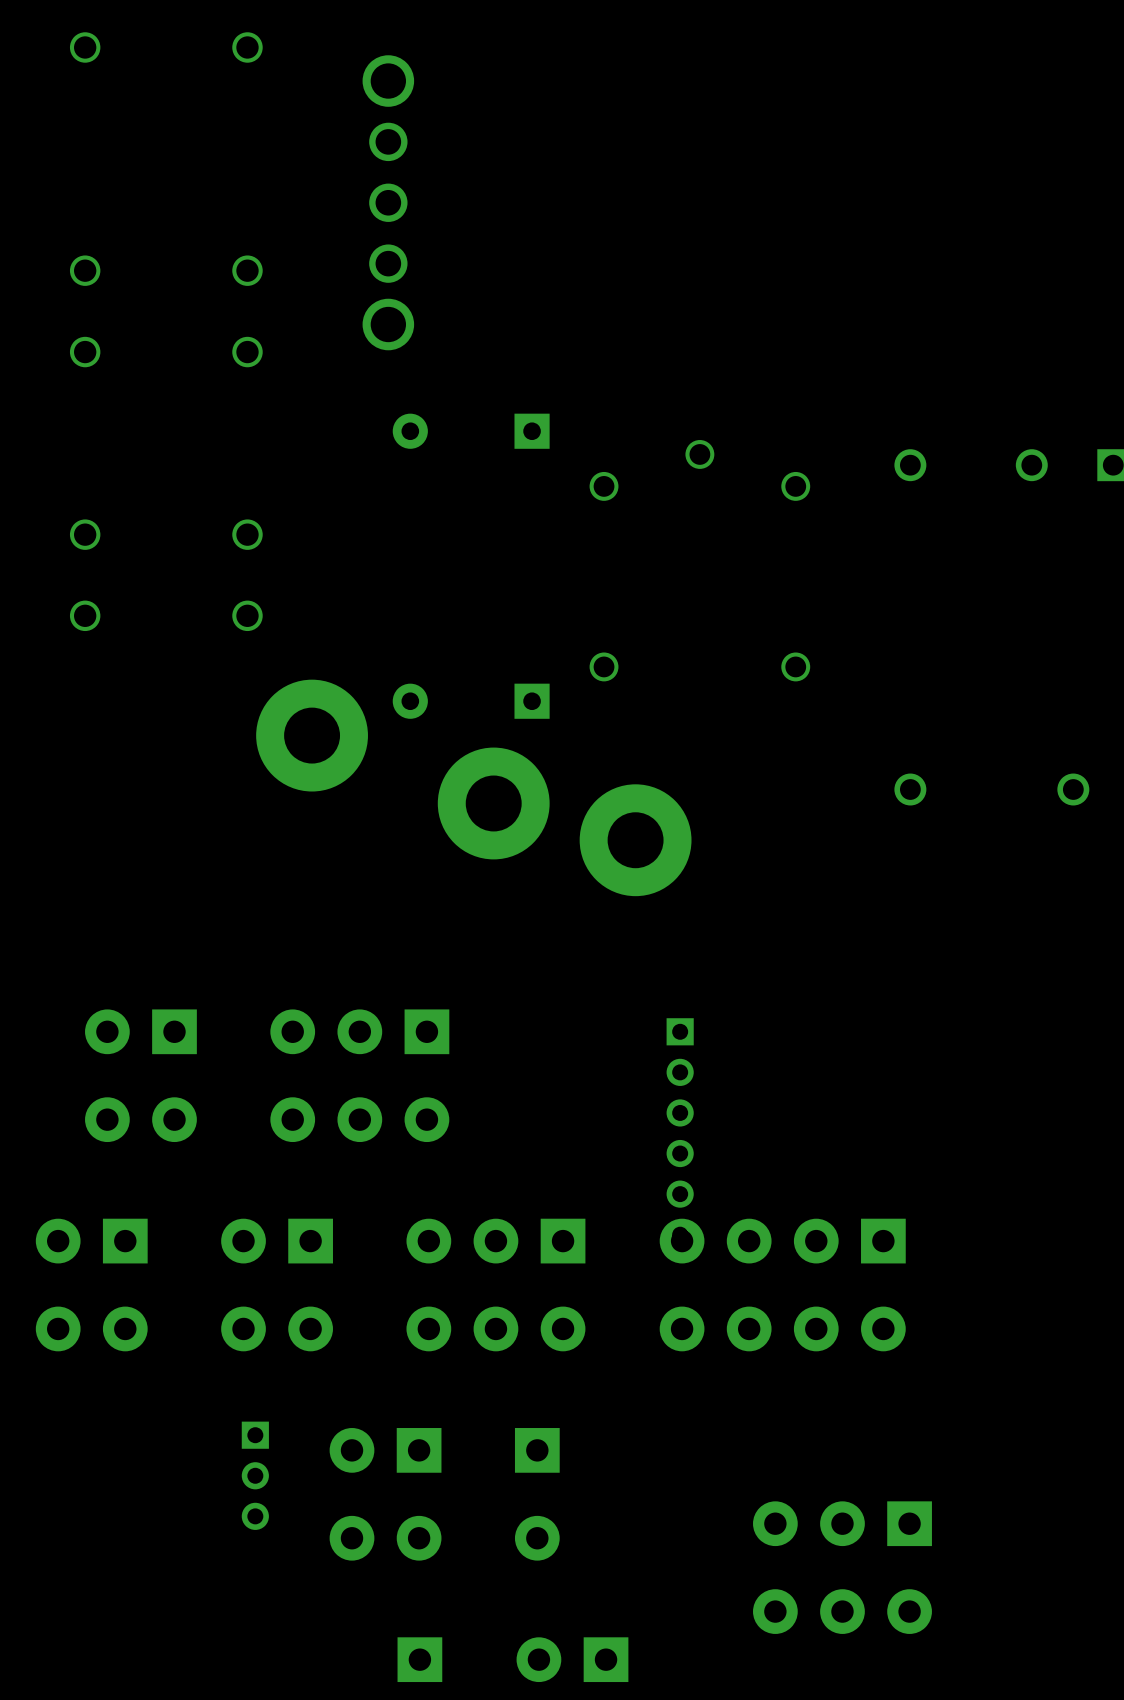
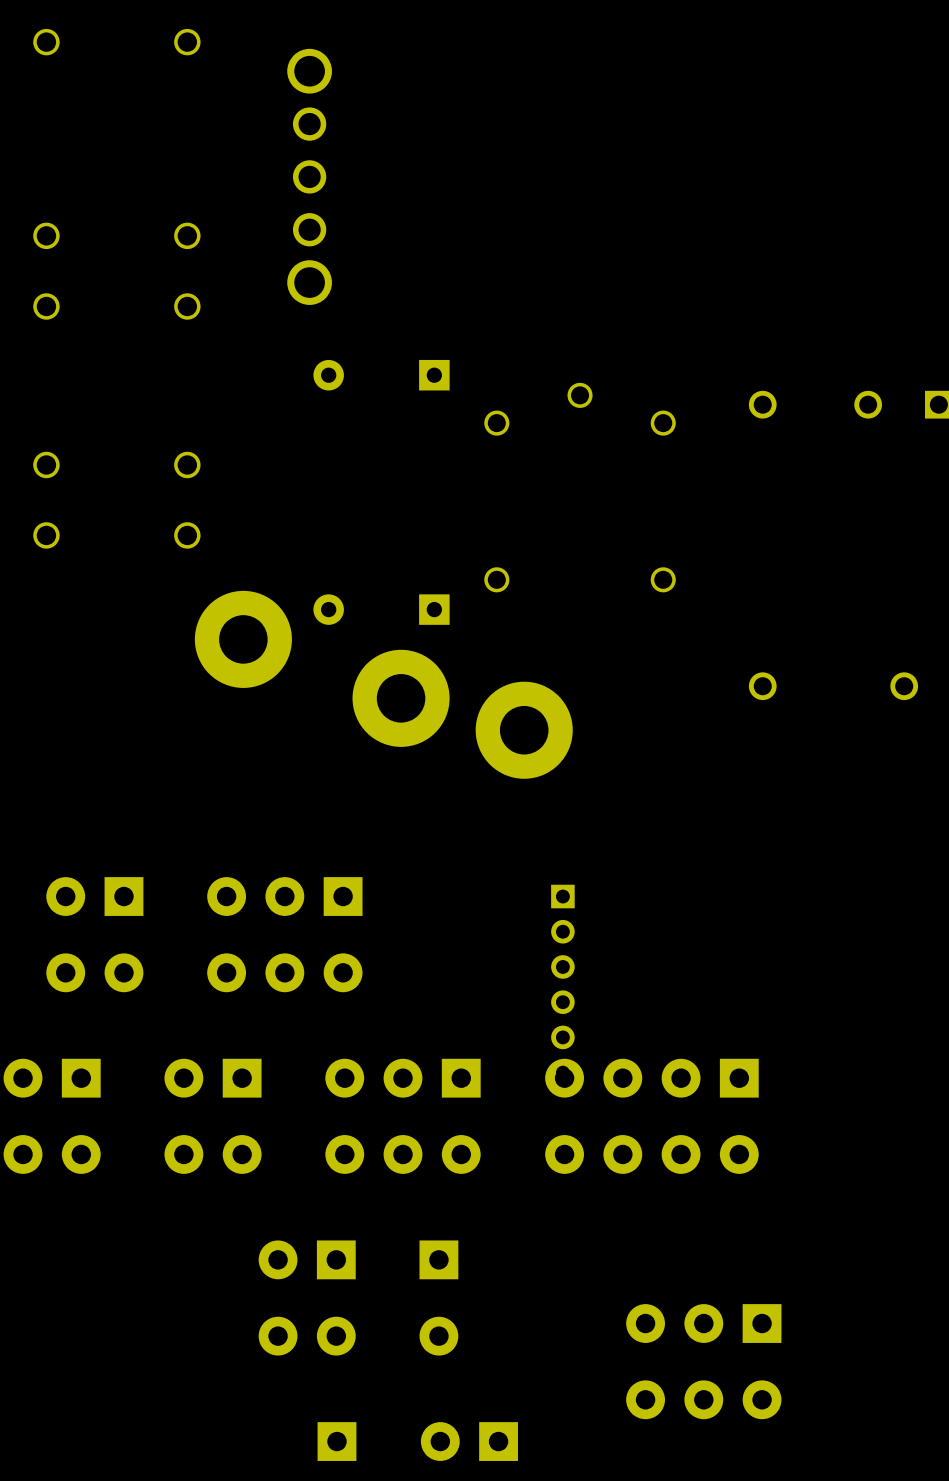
part: (255, 1475) -> none

